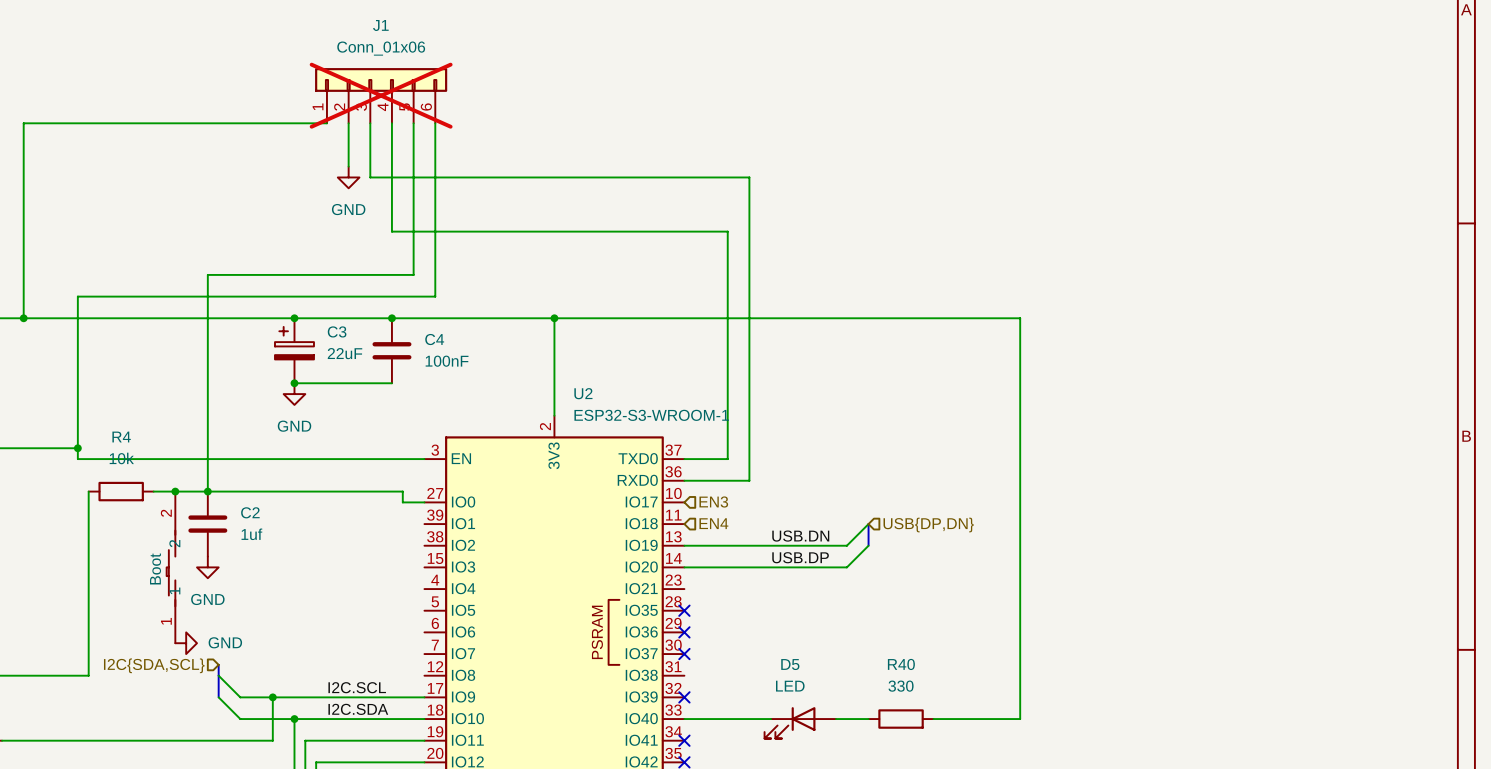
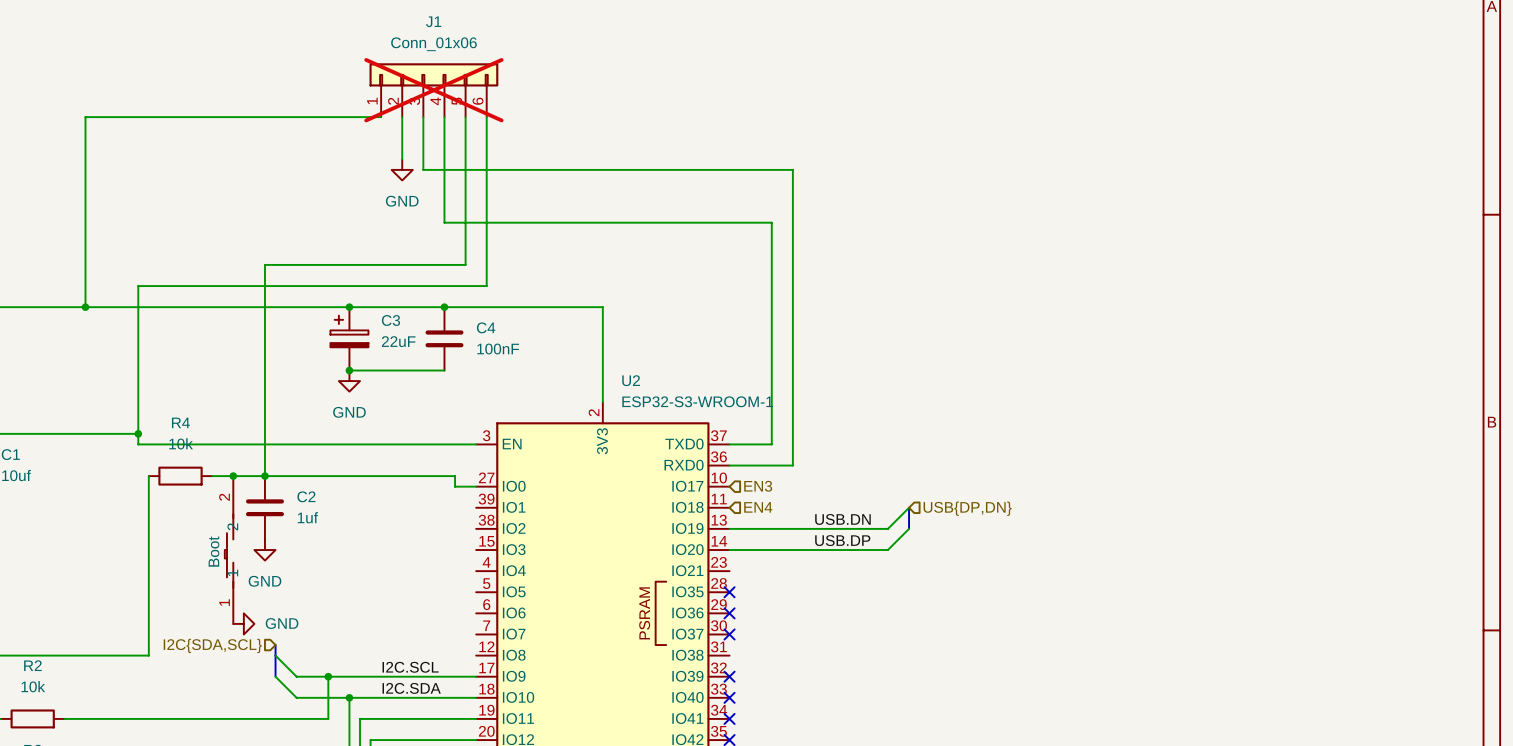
wire: (554, 318) (1020, 318) (1020, 719) (933, 719) -> none
junction: (554, 318) -> none
wire: (684, 719) (771, 719) -> none
no-connect mark: none -> (729, 697)
wire: (836, 719) (868, 719) -> none
R40: 330 (901, 719) -> none
D5: LED (800, 722) -> none

